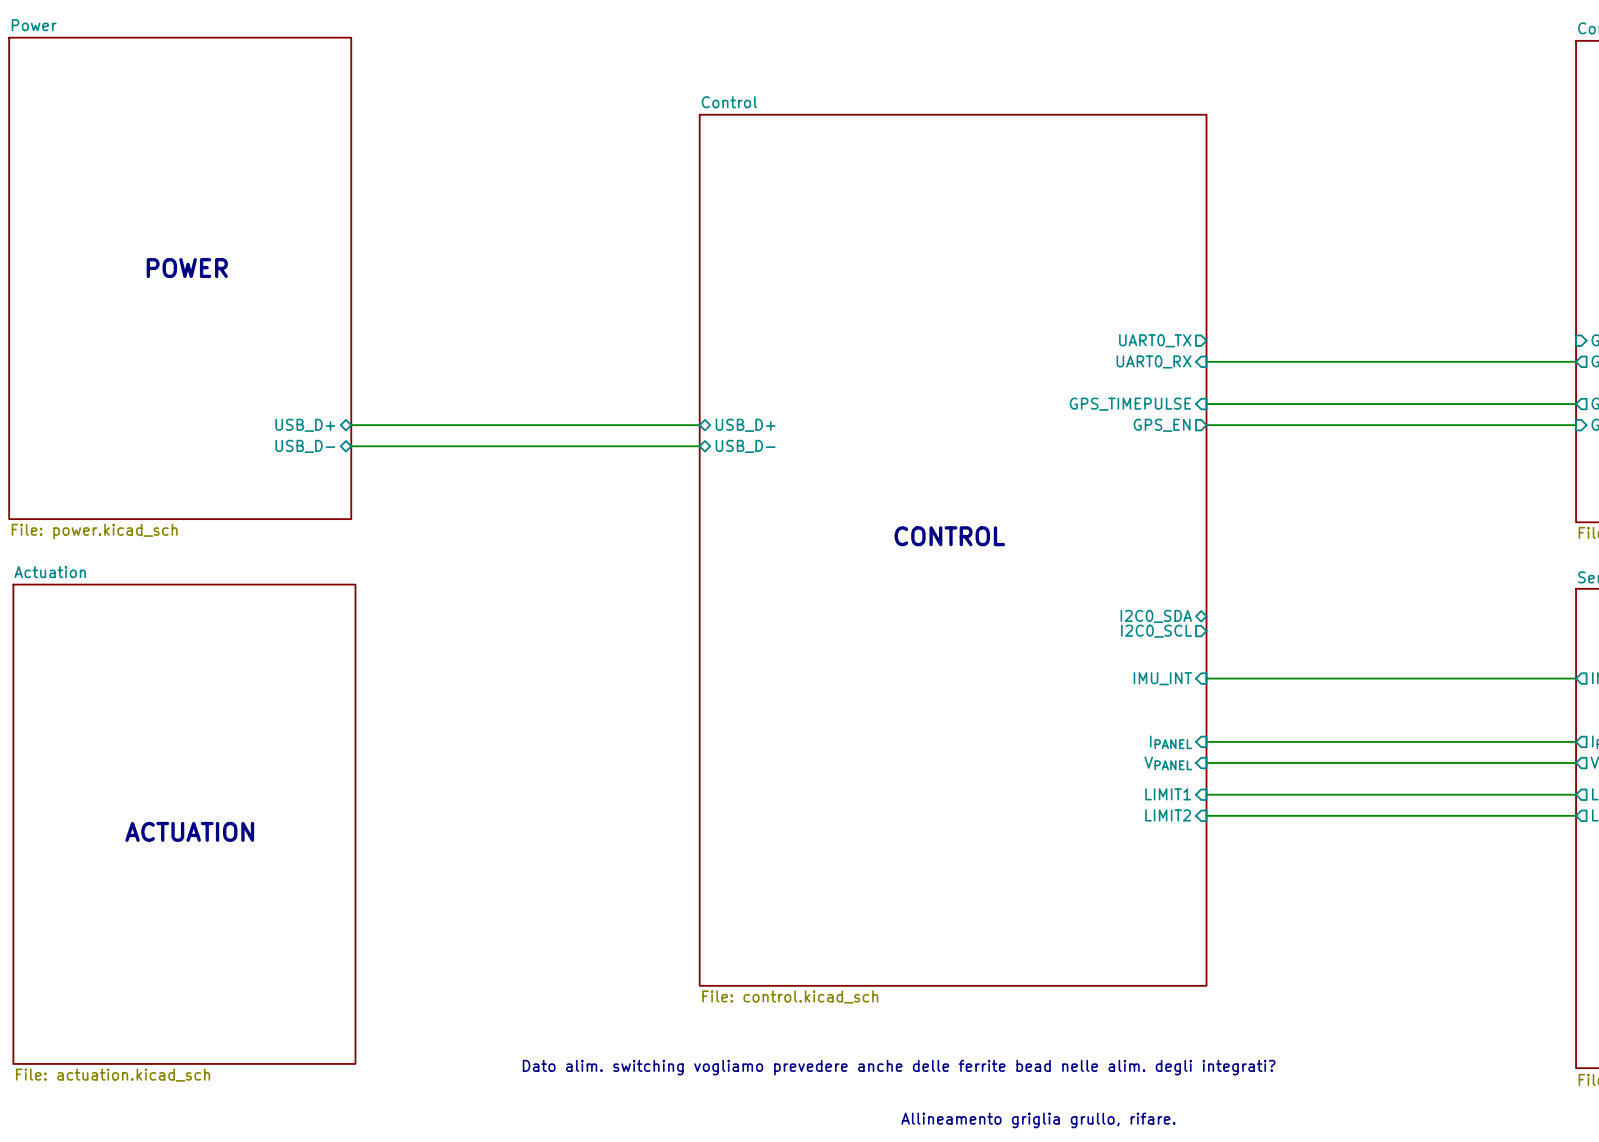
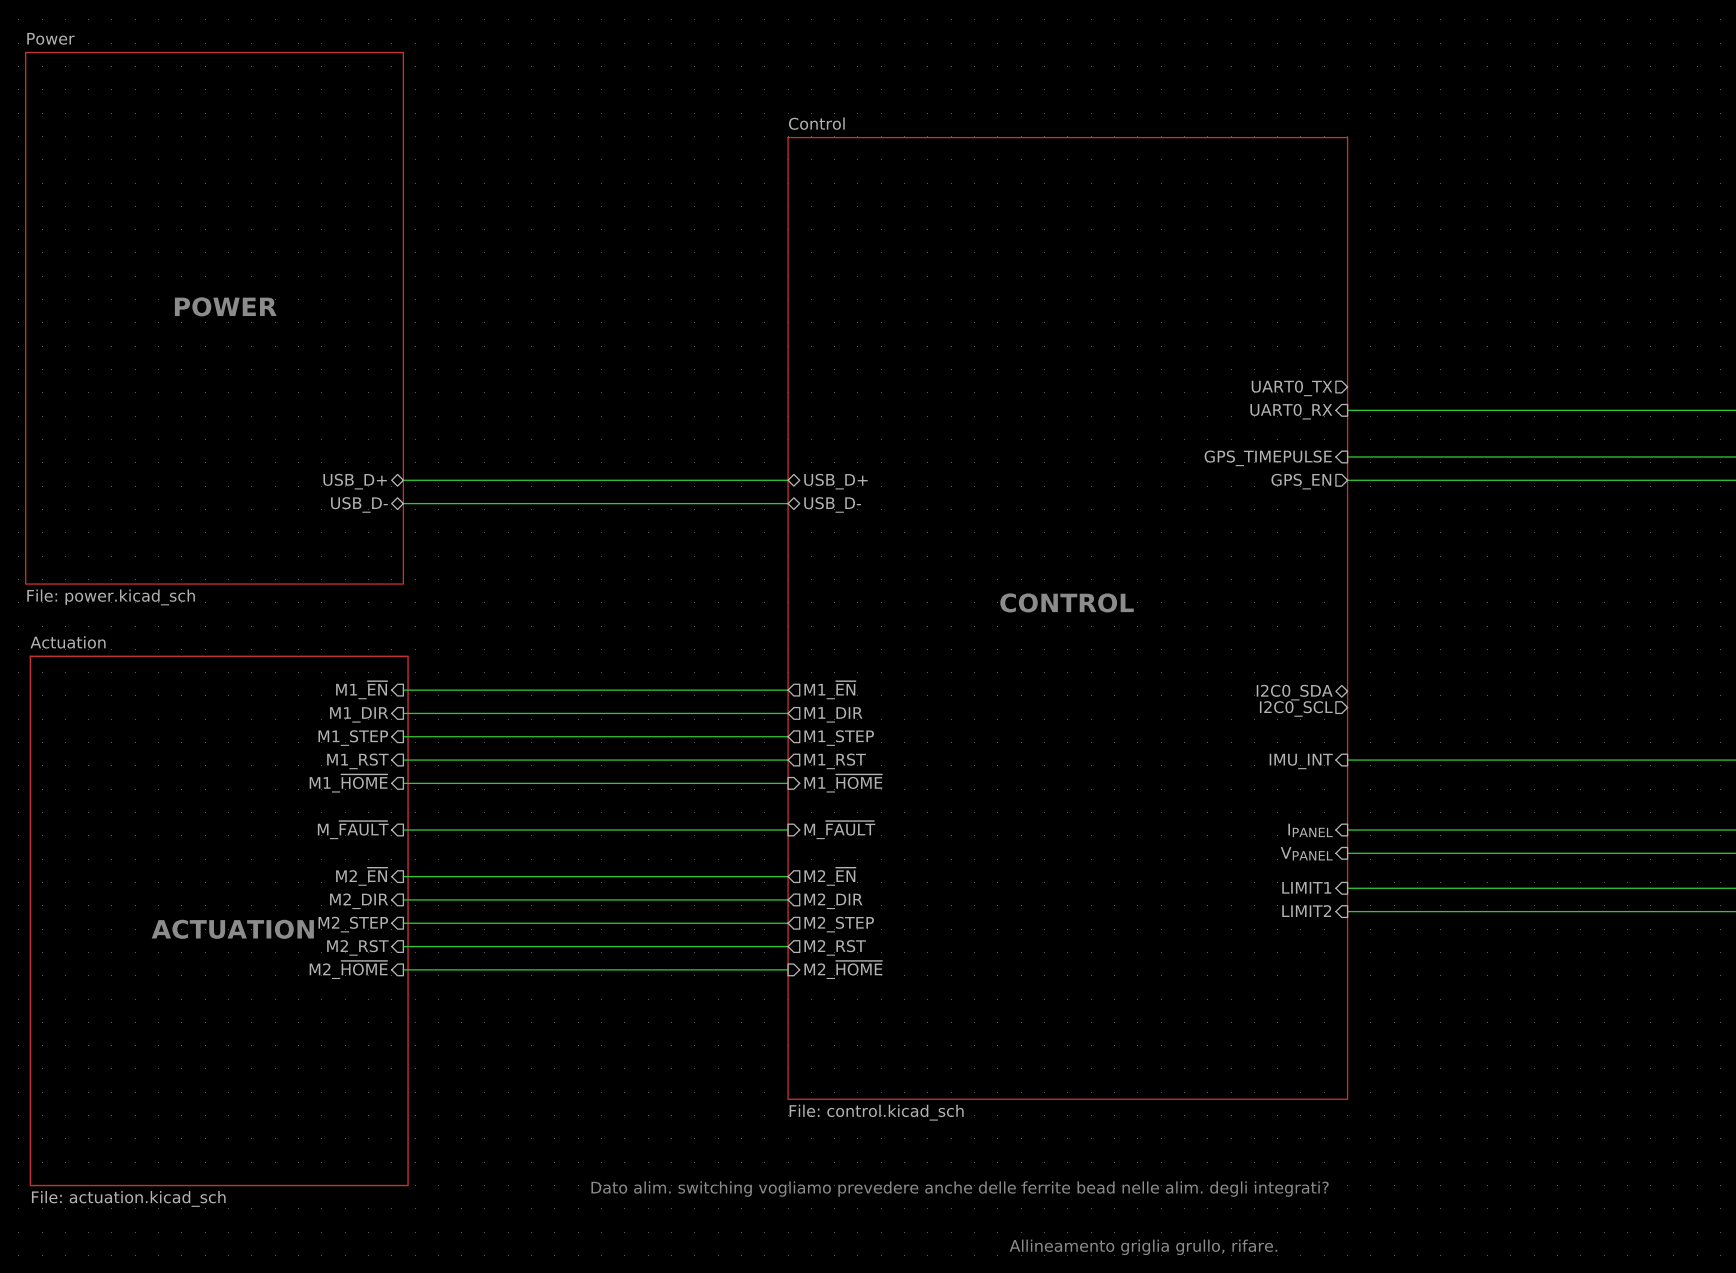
sheet pin: none -> M1_~{EN} (361, 690)
sheet pin: none -> M1_~{EN} (830, 690)
wire: none -> (403, 690) (788, 690)
sheet pin: none -> M1_DIR (359, 714)
wire: none -> (403, 713) (788, 713)
sheet pin: none -> M1_DIR (833, 714)
sheet pin: none -> M1_STEP (353, 738)
wire: none -> (403, 736) (788, 736)
sheet pin: none -> M1_STEP (839, 738)
sheet pin: none -> M1_RST (357, 761)
wire: none -> (403, 760) (788, 760)
sheet pin: none -> M1_RST (835, 761)
sheet pin: none -> M1_~{HOME} (348, 783)
sheet pin: none -> M1_~{HOME} (843, 783)
wire: none -> (403, 783) (788, 783)
sheet pin: none -> M_~{FAULT} (353, 830)
sheet pin: none -> M_~{FAULT} (839, 830)
wire: none -> (403, 830) (788, 830)
sheet pin: none -> M2_~{EN} (361, 876)
sheet pin: none -> M2_~{EN} (830, 876)
wire: none -> (403, 876) (788, 876)
sheet pin: none -> M2_DIR (359, 901)
wire: none -> (403, 899) (788, 899)
sheet pin: none -> M2_DIR (833, 901)
sheet pin: none -> M2_STEP (353, 924)
wire: none -> (403, 923) (788, 923)
sheet pin: none -> M2_STEP (839, 924)
sheet pin: none -> M2_RST (357, 947)
wire: none -> (403, 946) (788, 946)
sheet pin: none -> M2_RST (835, 947)
sheet pin: none -> M2_~{HOME} (348, 969)
sheet pin: none -> M2_~{HOME} (843, 969)
wire: none -> (403, 969) (788, 969)

